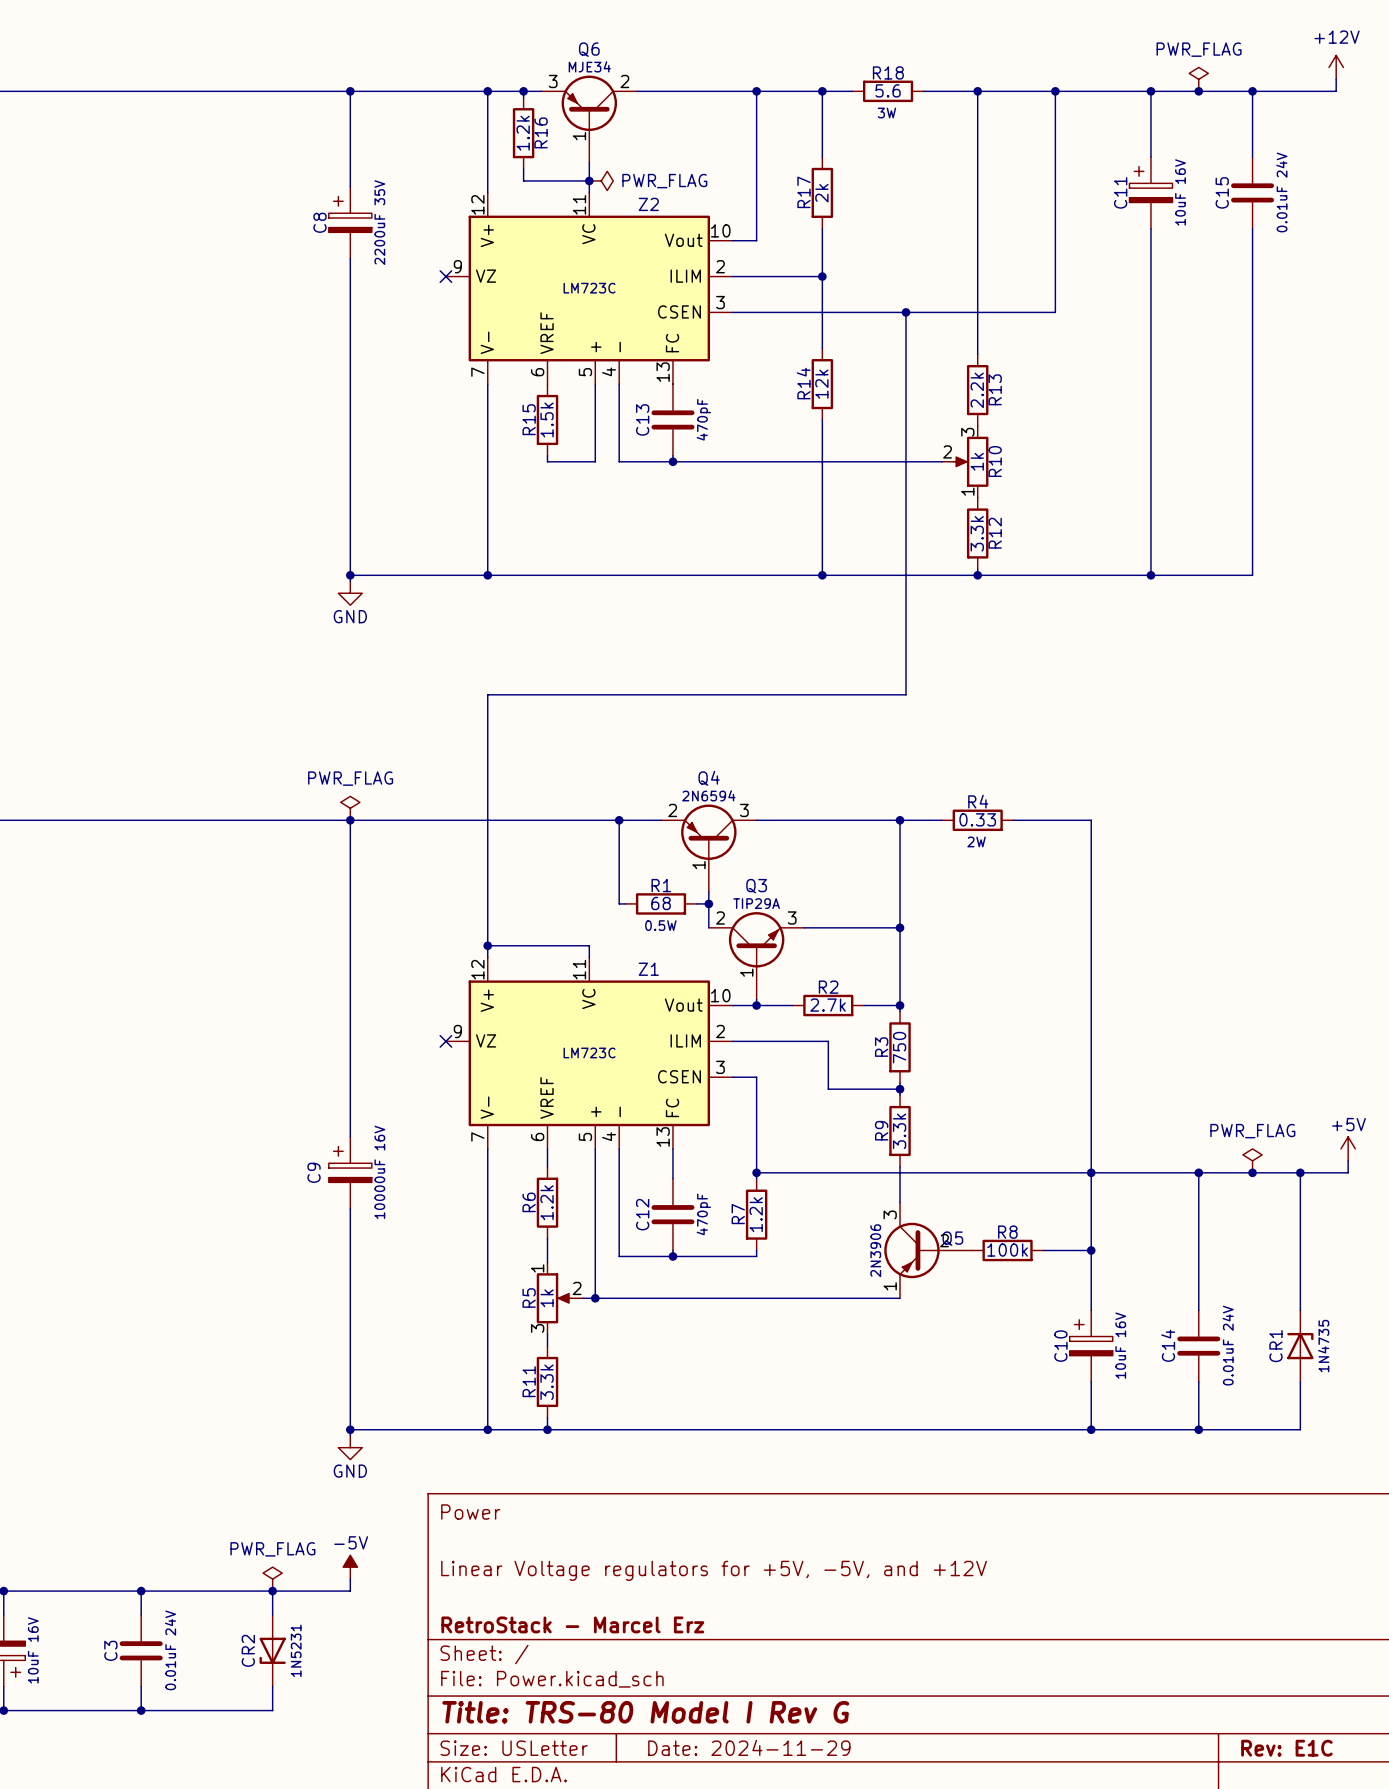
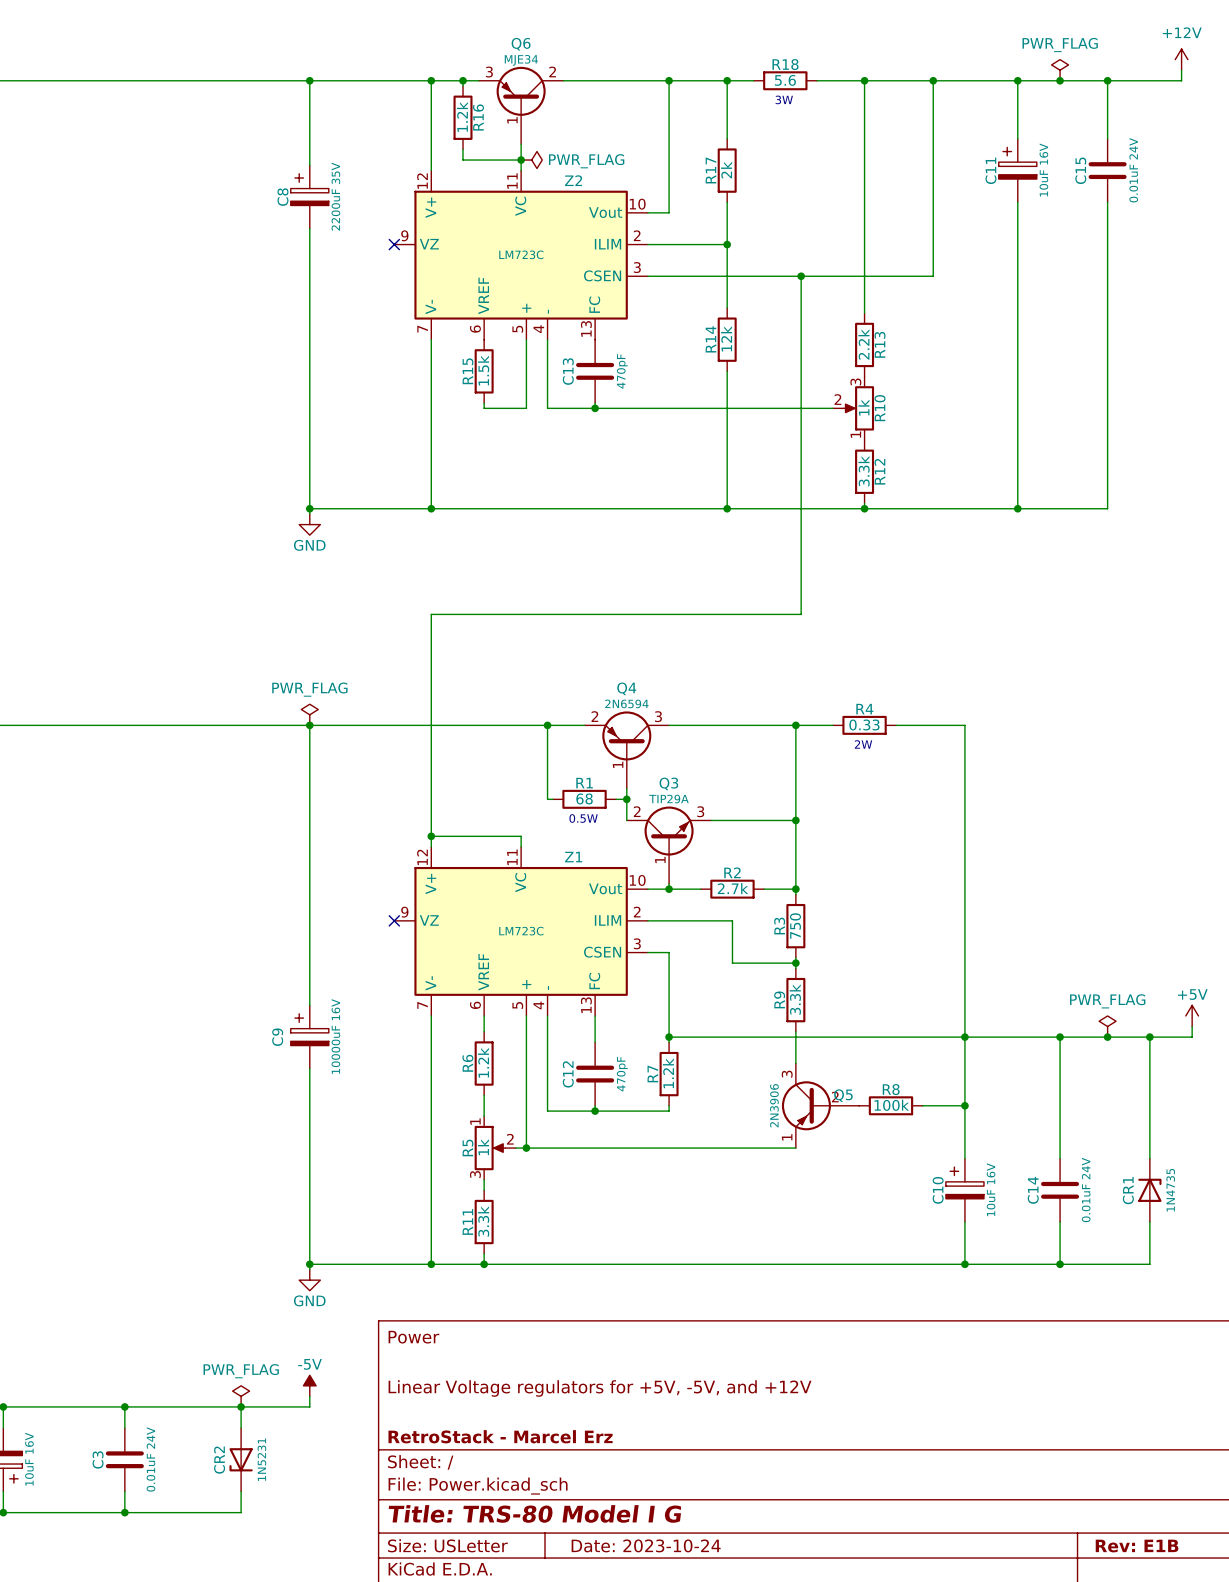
title block: Title: TRS-80 Model I Rev G (645, 1712) -> Title: TRS-80 Model I G (534, 1513)
title block: Date: 2024-11-29 (749, 1747) -> Date: 2023-10-24 (646, 1545)
title block: Rev: E1C (1286, 1748) -> Rev: E1B (1137, 1546)

